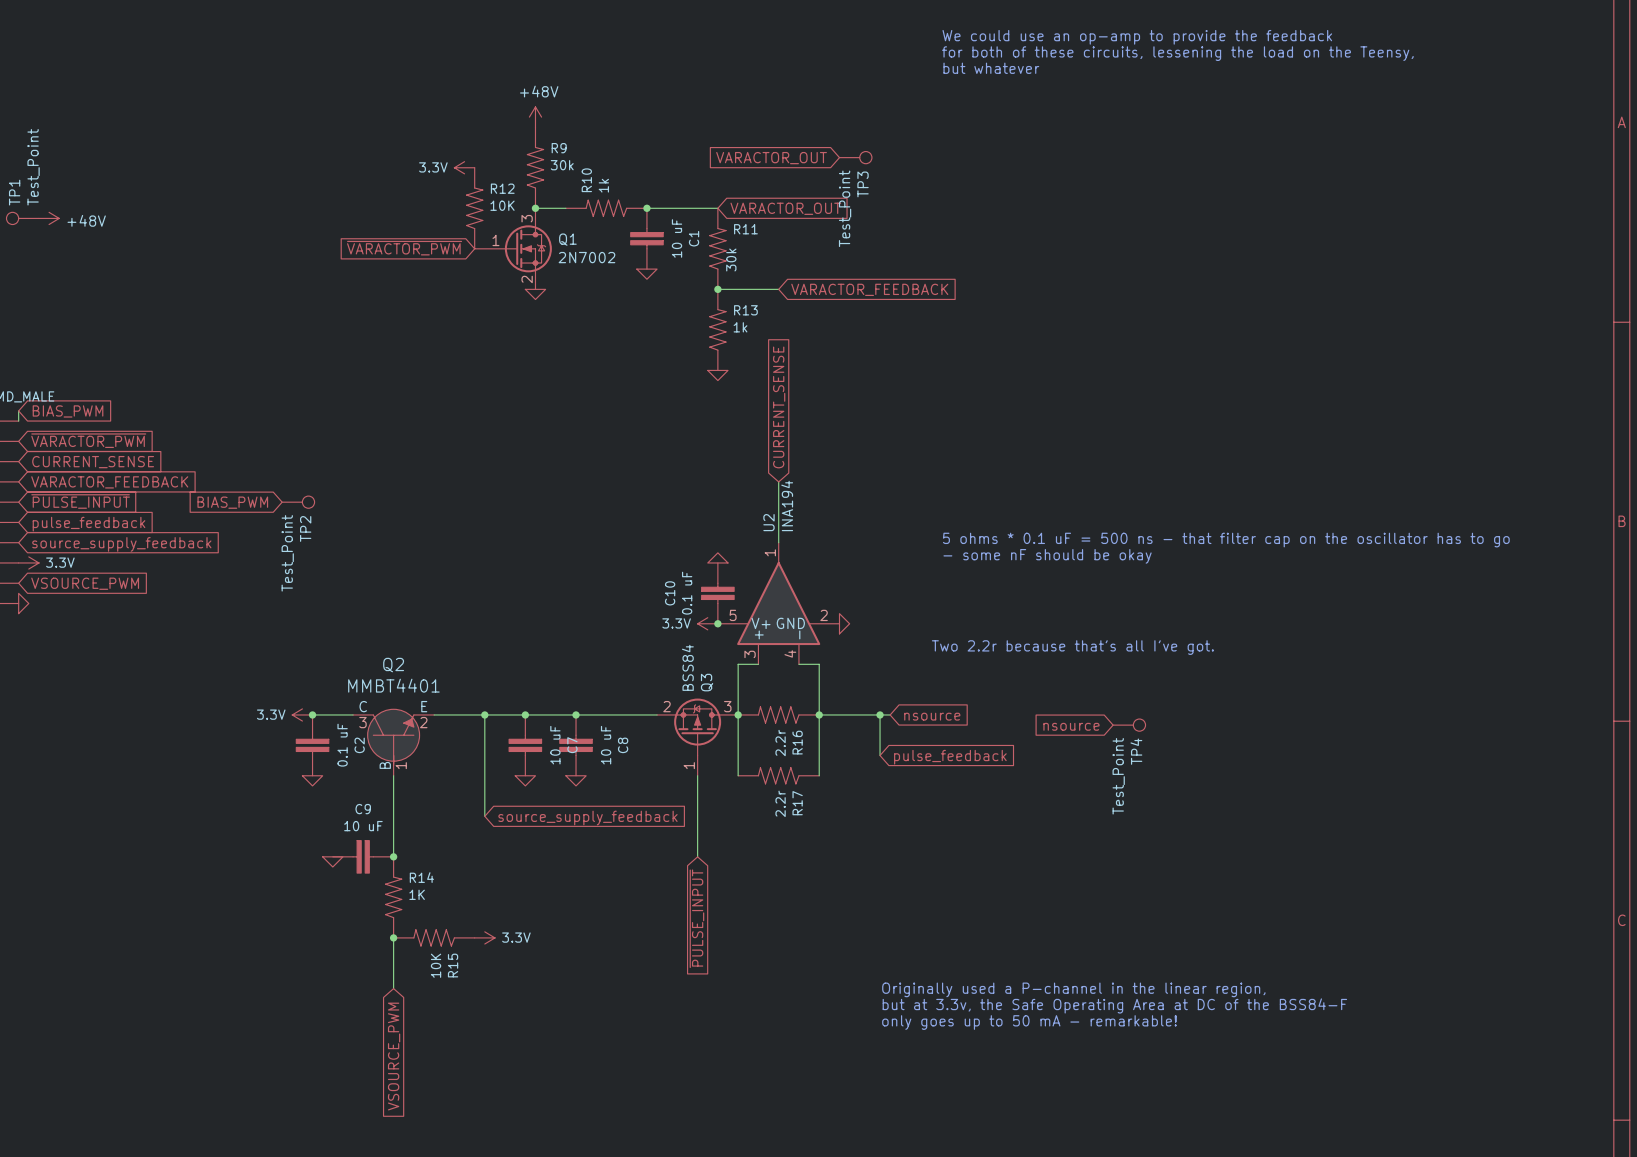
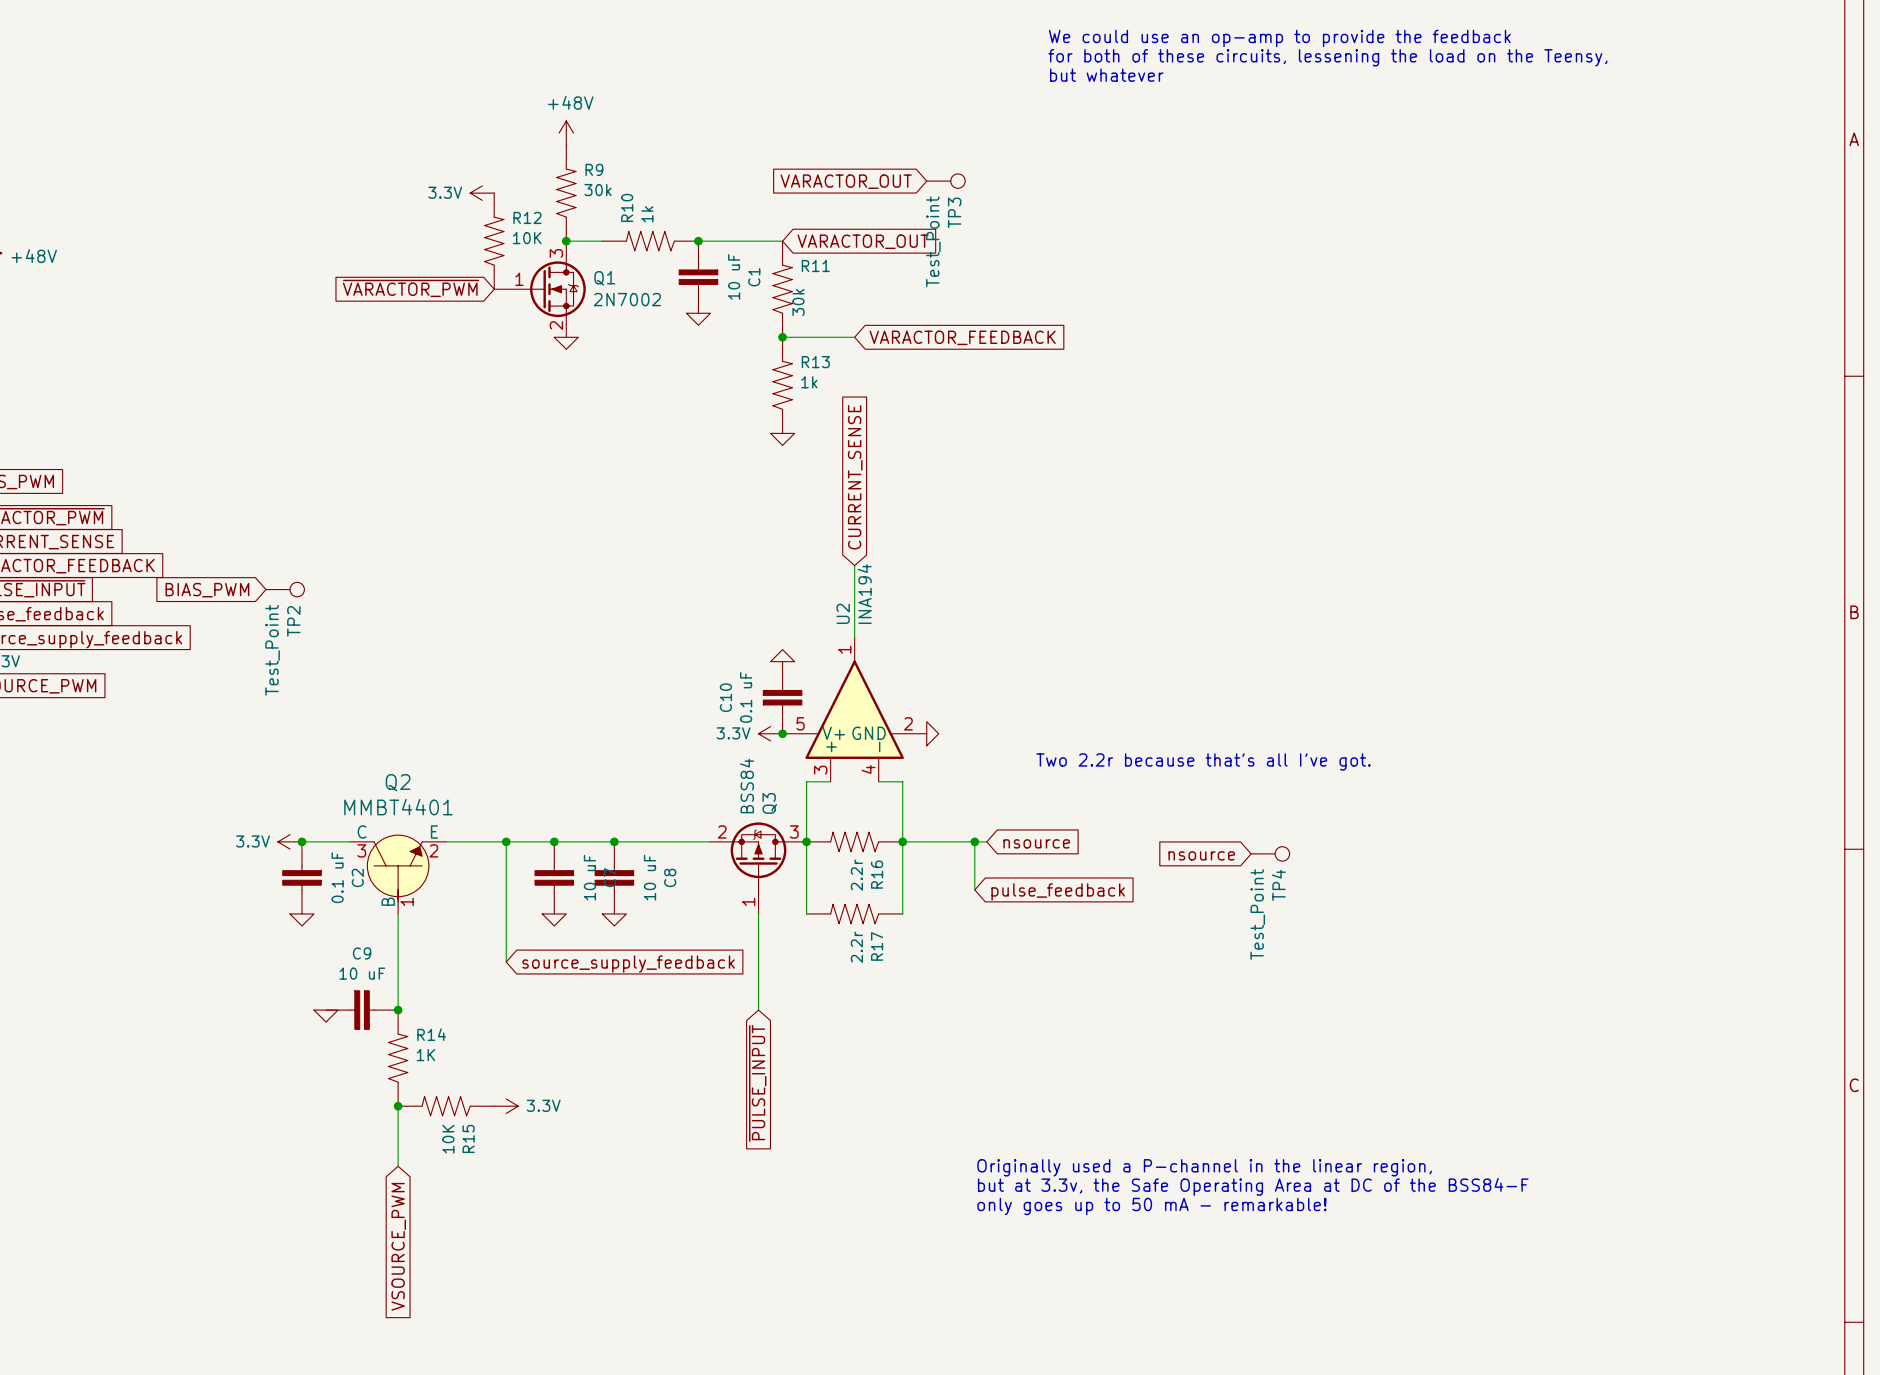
text: 5 ohms * 0.1 uF = 500 ns - that filter cap on the oscillator has to go (1226, 540) -> none
text: - some nF should be okay (1047, 556) -> none

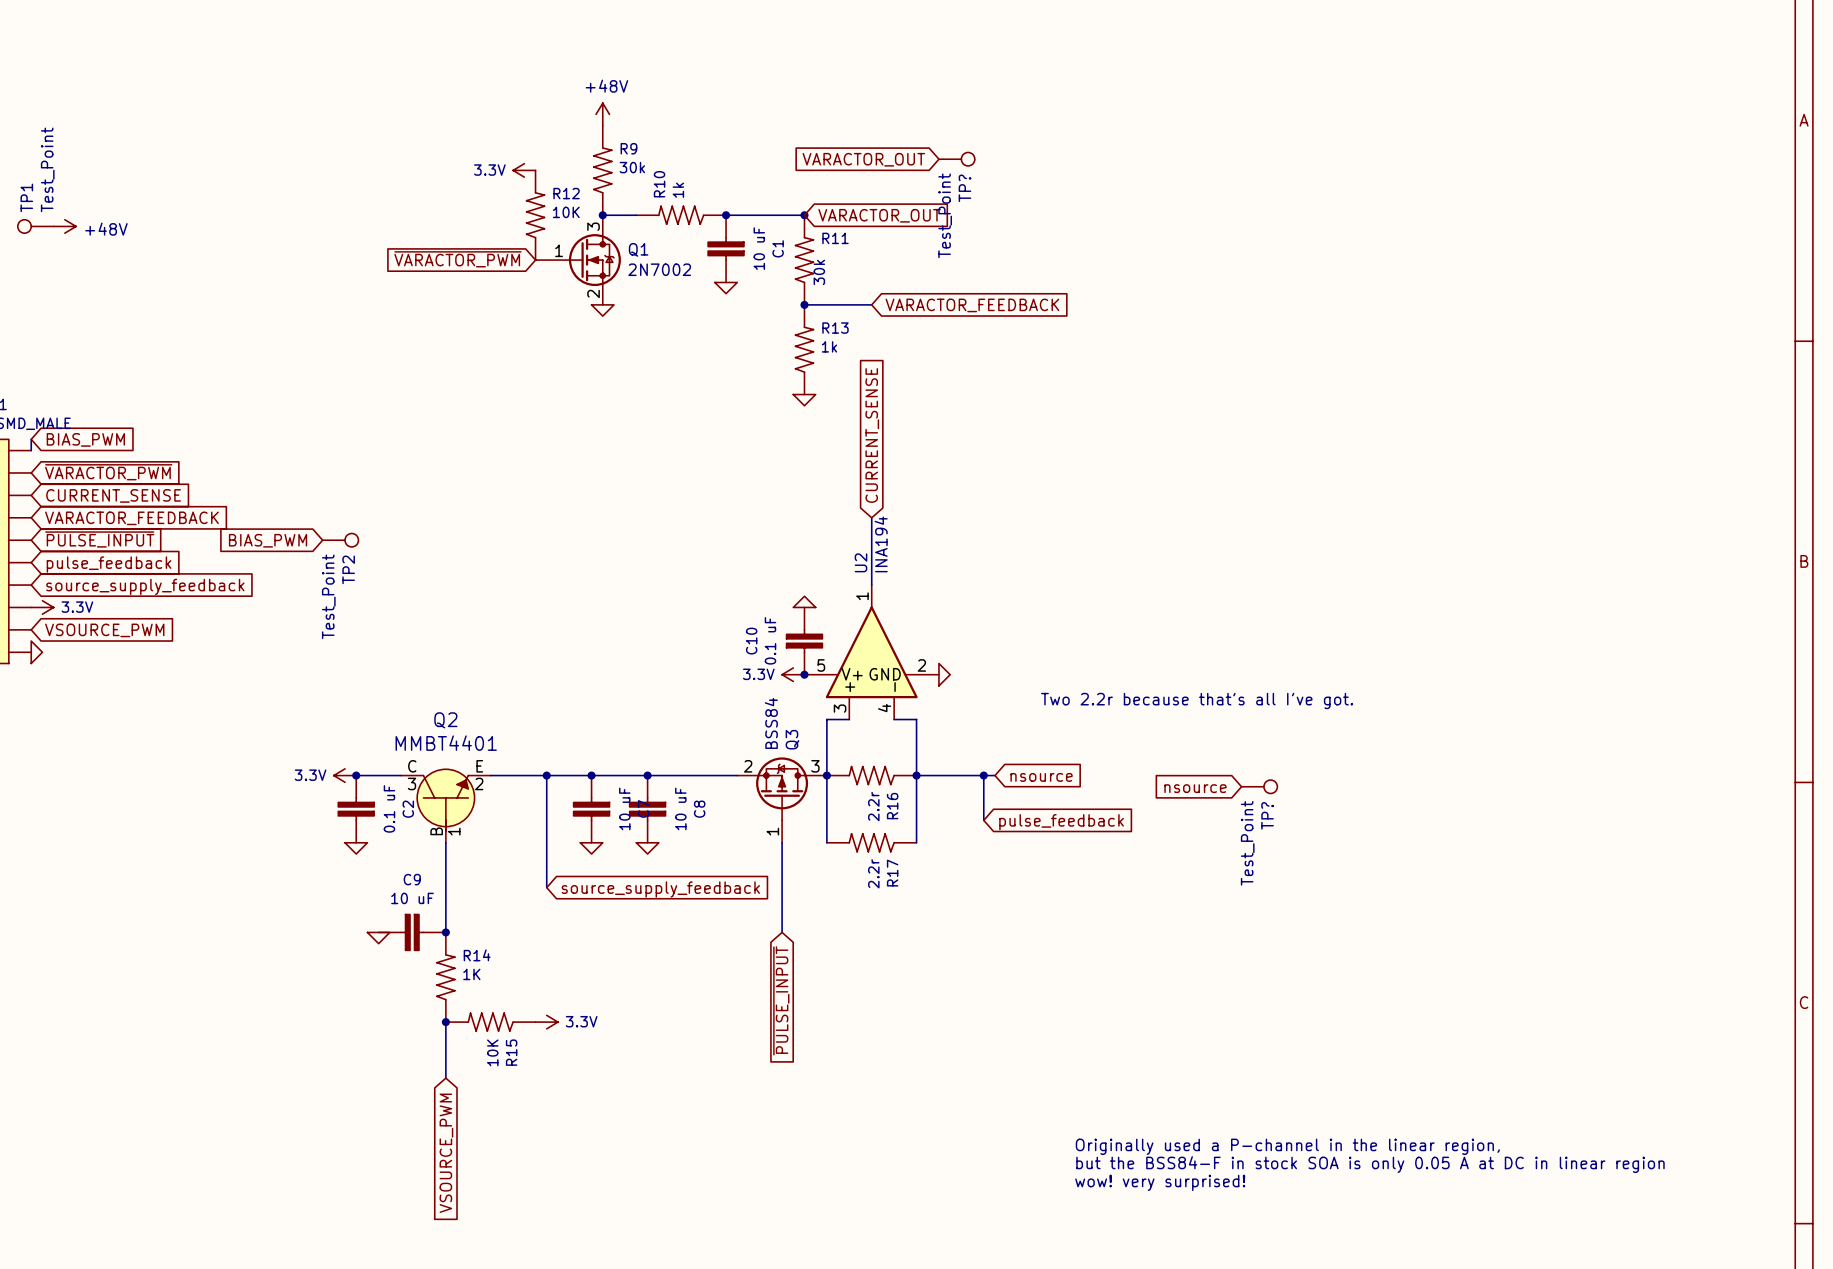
text: We could use an op-amp to provide the feedback (1279, 38) -> none
text: for both of these circuits, lessening the load on the Teensy, (1327, 57) -> none
text: but whatever (1106, 75) -> none
TP3 name: TP3 (954, 212) -> TP? (964, 188)
junction: none -> (804, 215)
TP4 name: TP4 (1278, 885) -> TP? (1267, 815)
text position: Originally used a P-channel in the linear region, (1204, 1167) -> Originally used a P-channel in the linear region, (1287, 1146)
text: but at 3.3v, the Safe Operating Area at DC of the BSS84-F (1253, 1186) -> none
text: only goes up to 50 mA - remarkable! (1151, 1206) -> none
text: none -> but the BSS84-F in stock SOA is only 0.05 A at DC in linear region (1370, 1164)
text: none -> wow! very surprised! (1160, 1182)

